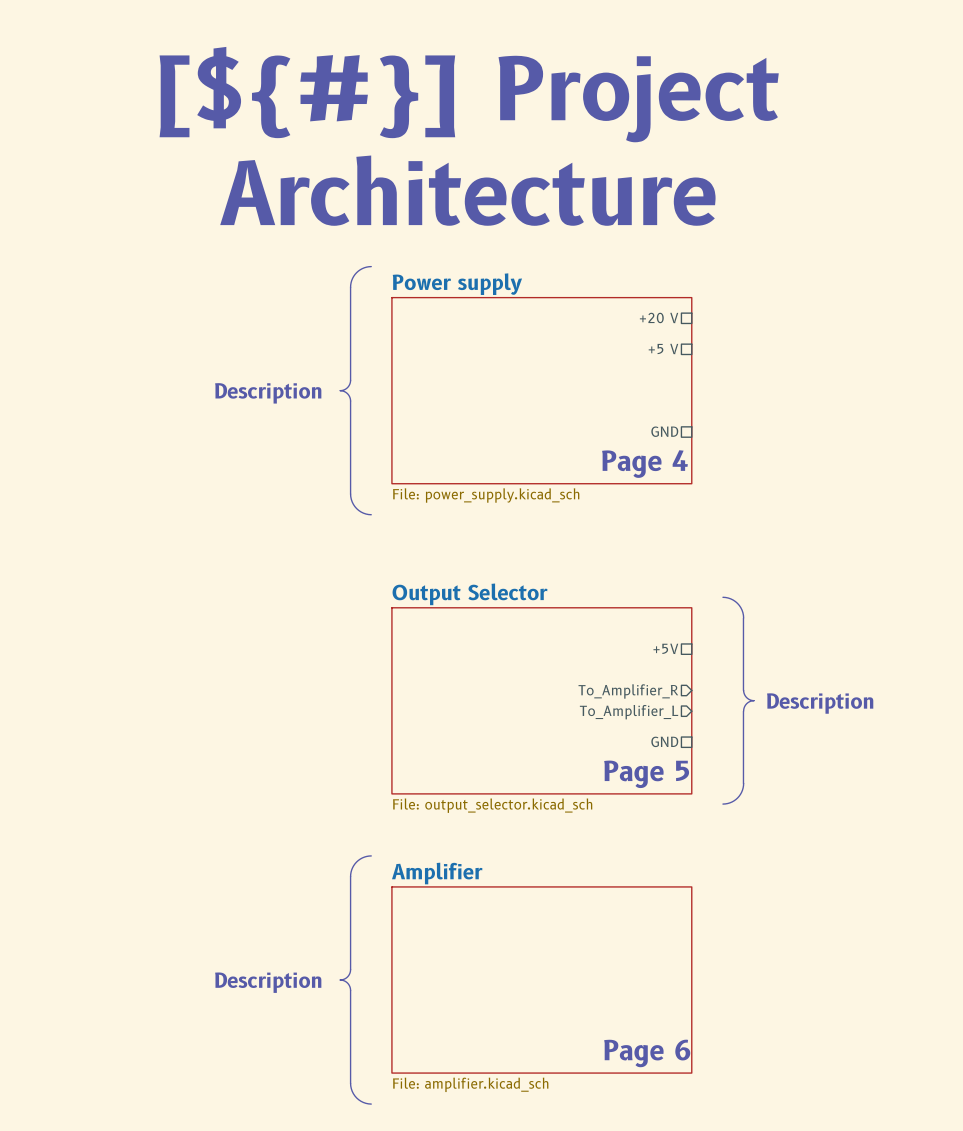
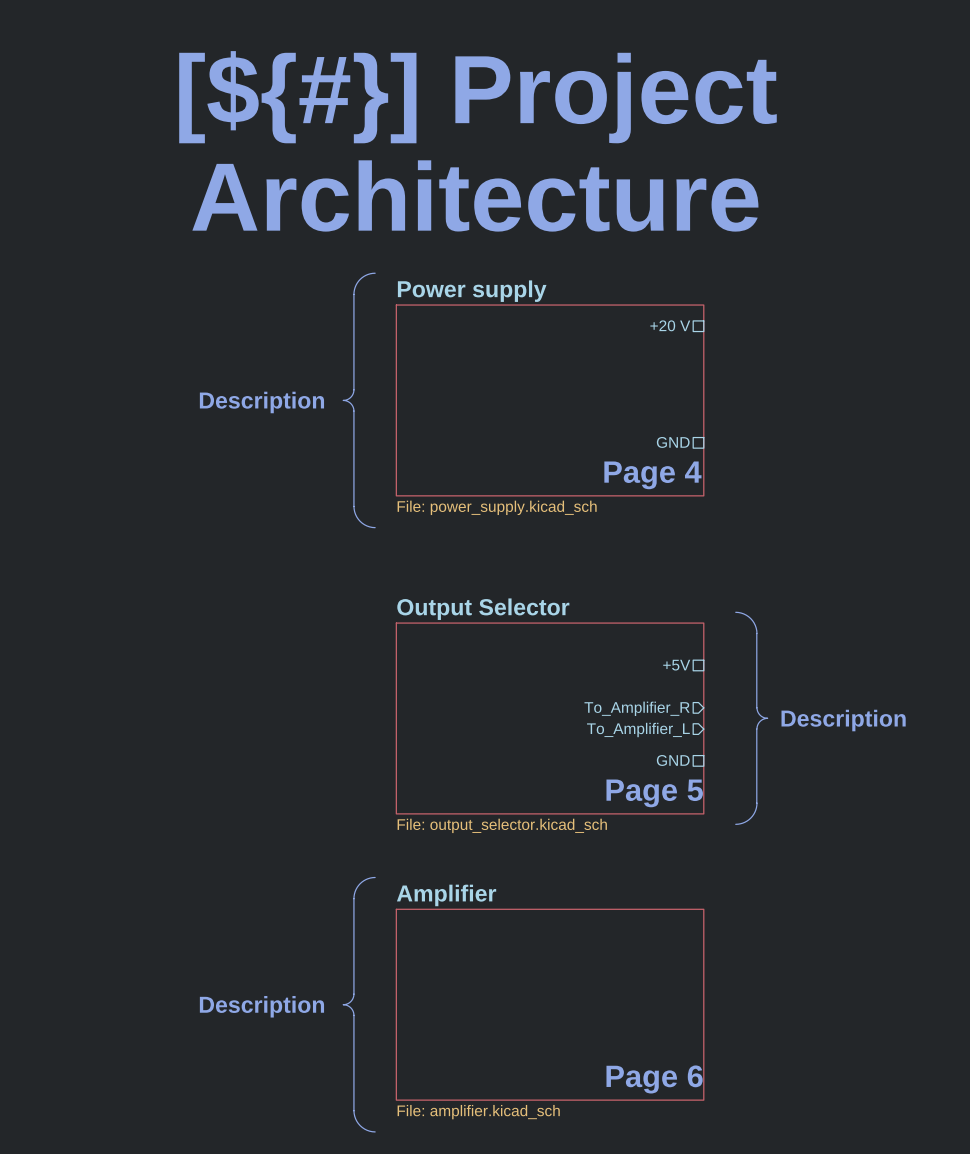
sheet pin: +5 V (663, 348) -> none

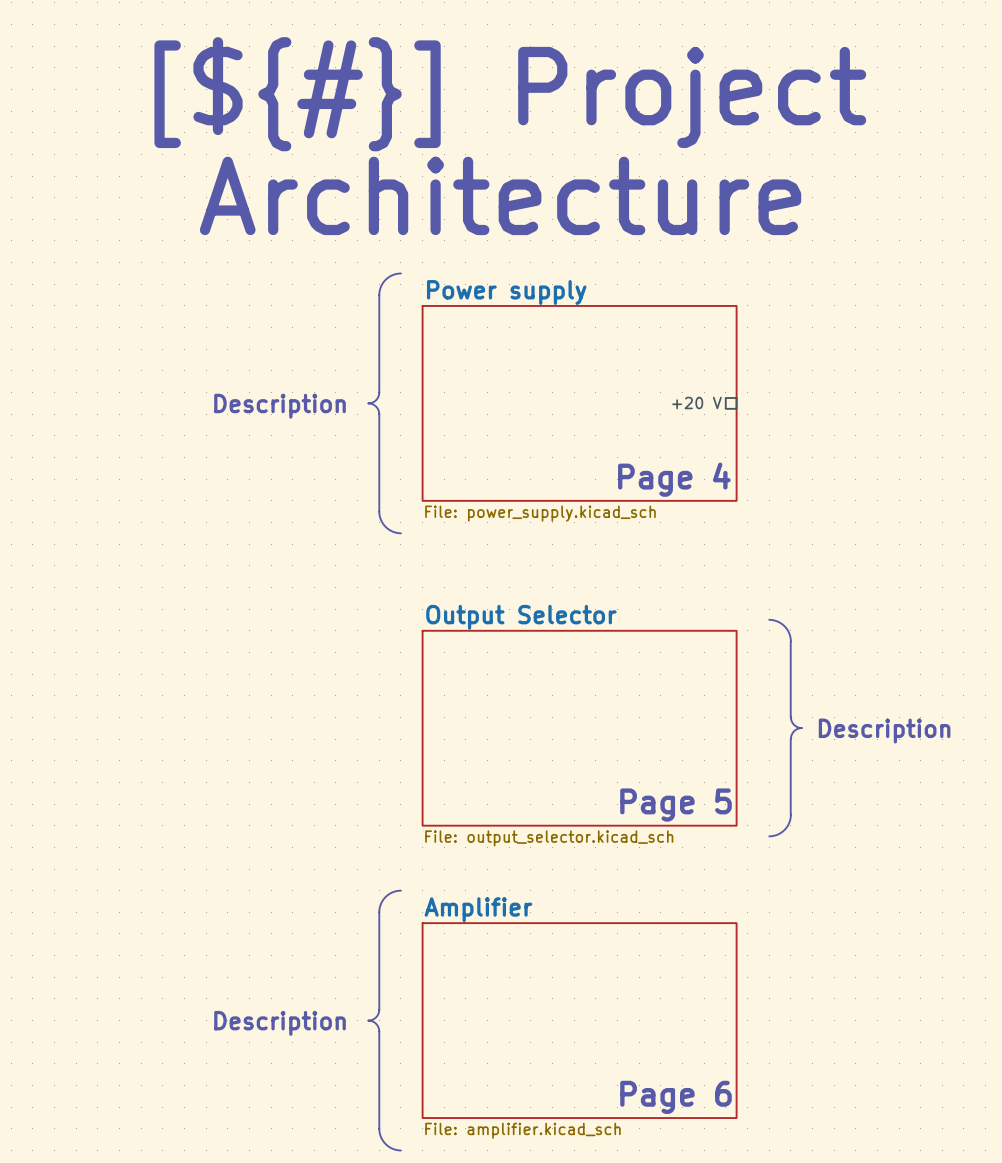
sheet pin position: +20 V (670, 325) -> +20 V (696, 403)
sheet pin: GND (673, 442) -> none
sheet pin: +5V (676, 665) -> none
sheet pin: To_Amplifier_R (637, 708) -> none
sheet pin: To_Amplifier_L (638, 730) -> none
sheet pin: GND (673, 760) -> none

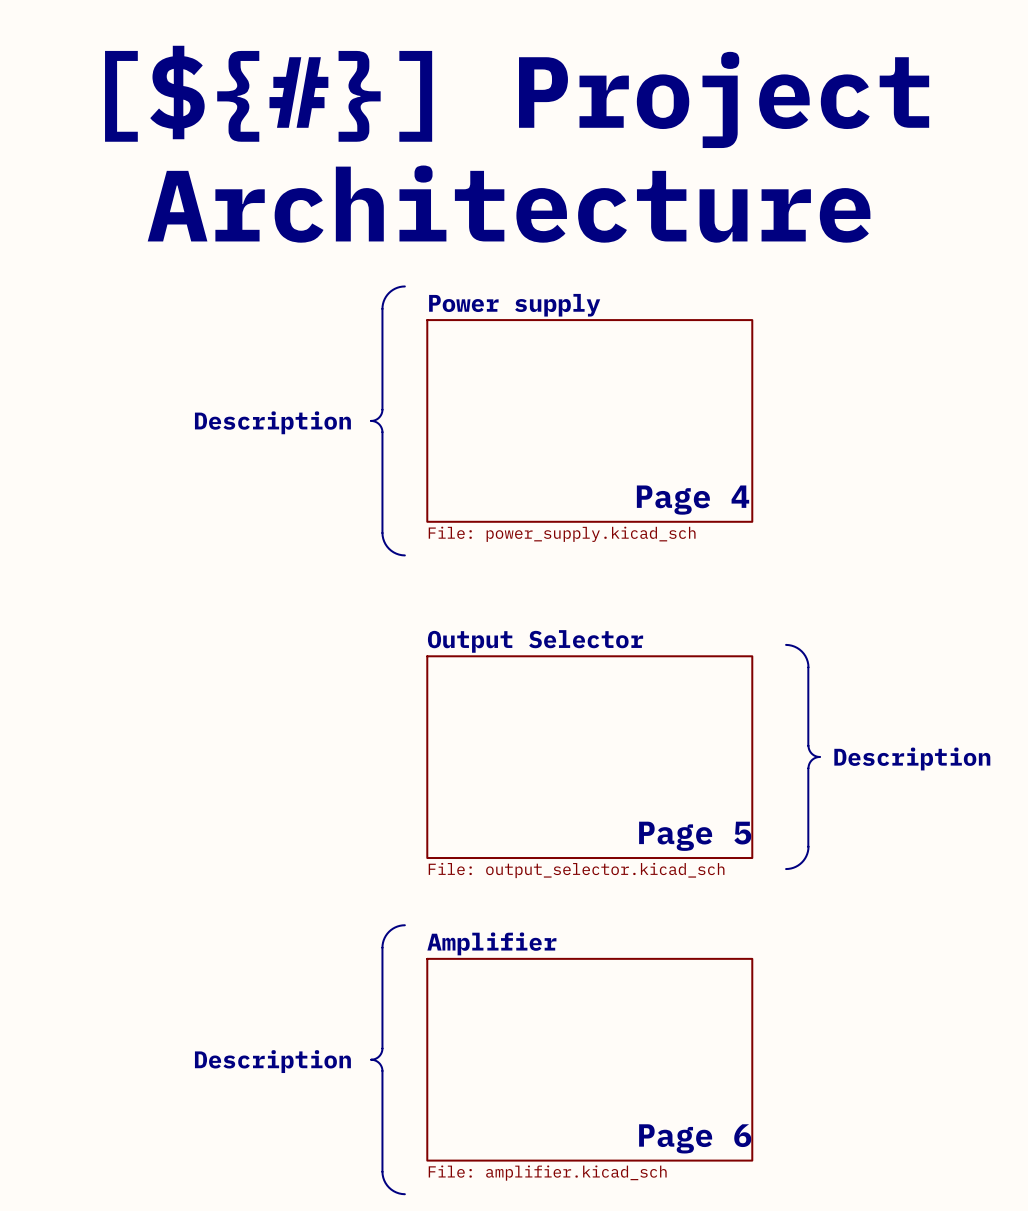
sheet pin: +20 V (696, 403) -> none

